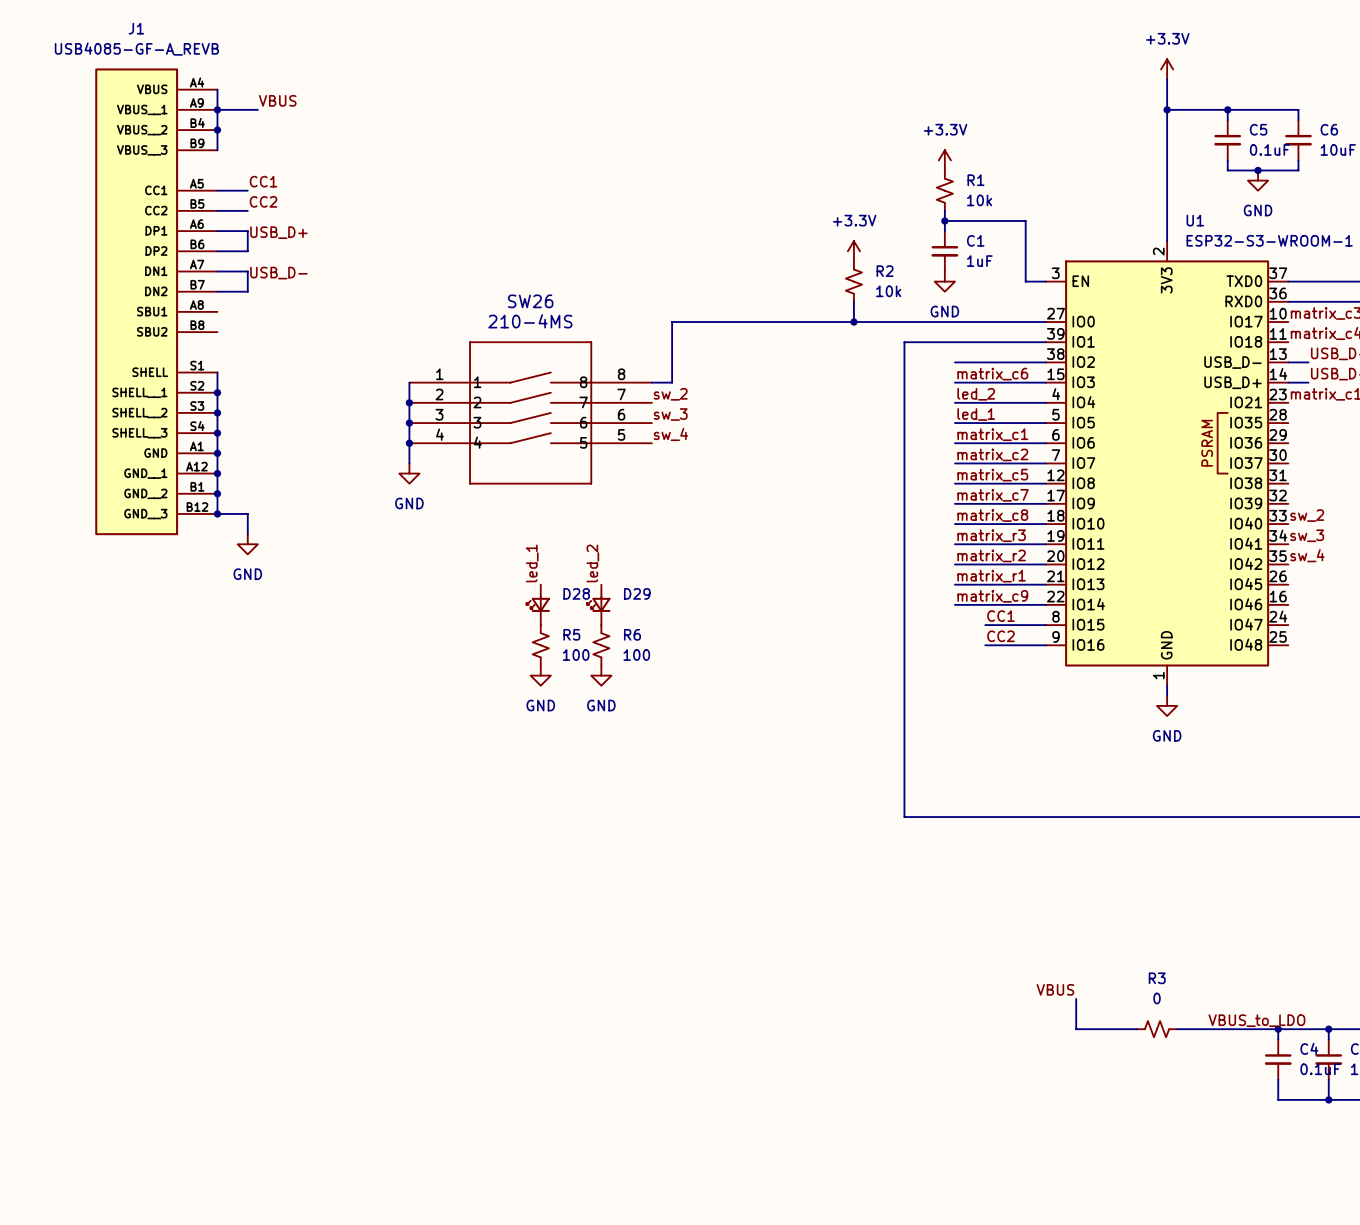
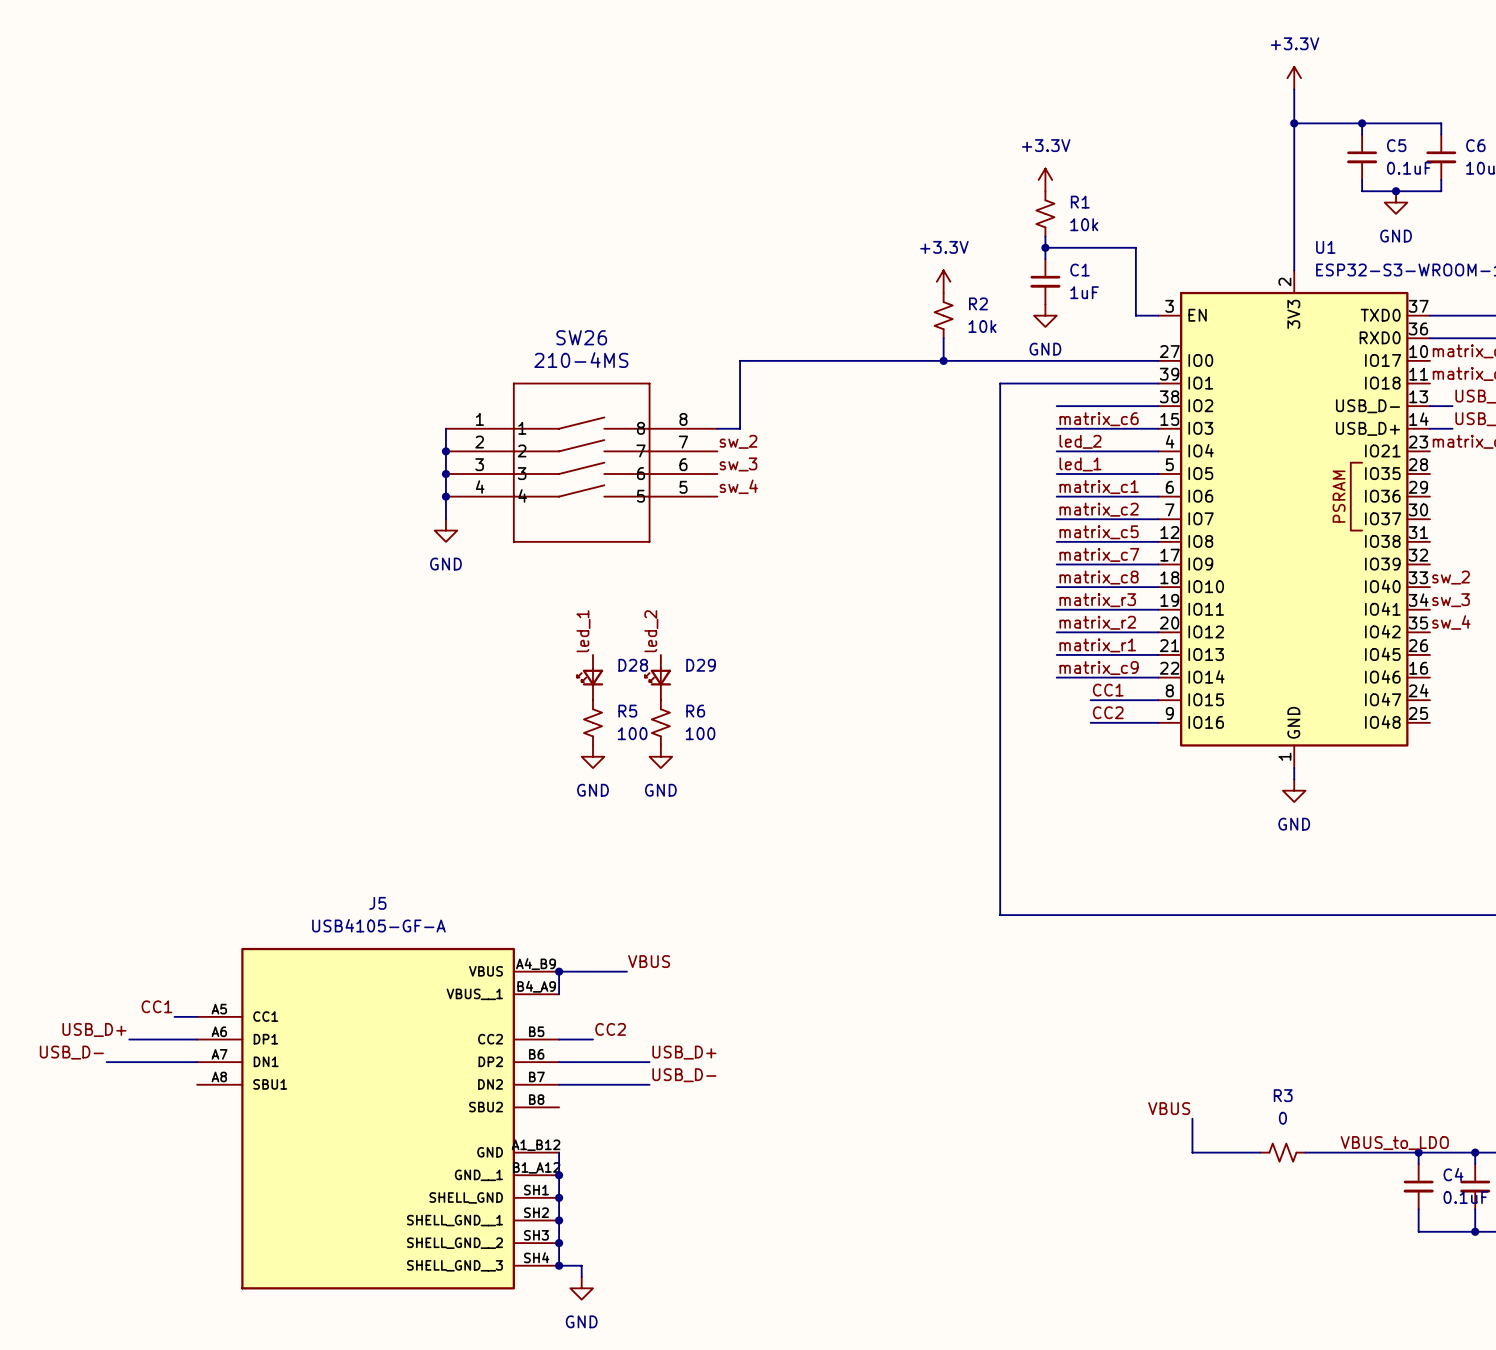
wire: (217, 89) (217, 150) -> none
label: VBUS (277, 100) -> none
wire: (217, 109) (257, 109) -> none
junction: (217, 109) -> none
junction: (217, 130) -> none
label: CC1 (263, 181) -> none
wire: (217, 190) (247, 190) -> none
label: CC2 (263, 201) -> none
wire: (217, 210) (247, 210) -> none
wire: (217, 231) (247, 231) (247, 251) (217, 251) -> none
label: USB_D+ (278, 232) -> none
wire: (217, 271) (247, 271) (247, 291) (217, 291) -> none
label: USB_D- (278, 273) -> none
J1: USB4085-GF-A_REVB (156, 301) -> none
wire: (217, 372) (217, 513) (247, 513) (247, 534) -> none
junction: (217, 392) -> none
junction: (217, 412) -> none
junction: (217, 433) -> none
junction: (217, 453) -> none
junction: (217, 473) -> none
junction: (217, 493) -> none
junction: (217, 513) -> none
power symbol: GND (247, 544) -> none
label: none -> VBUS (649, 961)
junction: none -> (559, 971)
wire: none -> (626, 971) (559, 971) (559, 994)
label: none -> CC1 (156, 1006)
wire: none -> (174, 1016) (197, 1016)
label: none -> USB_D+ (94, 1029)
label: none -> CC2 (610, 1029)
wire: none -> (129, 1039) (197, 1039)
wire: none -> (559, 1039) (593, 1039)
label: none -> USB_D- (71, 1052)
label: none -> USB_D+ (684, 1052)
wire: none -> (106, 1062) (197, 1062)
wire: none -> (559, 1062) (649, 1062)
label: none -> USB_D- (684, 1075)
wire: none -> (559, 1084) (649, 1084)
J5: none -> USB4105-GF-A (378, 1118)
wire: none -> (559, 1152) (559, 1265) (581, 1265) (581, 1277)
junction: none -> (559, 1175)
junction: none -> (559, 1197)
junction: none -> (559, 1220)
junction: none -> (559, 1243)
junction: none -> (559, 1265)
power symbol: none -> GND (581, 1288)

